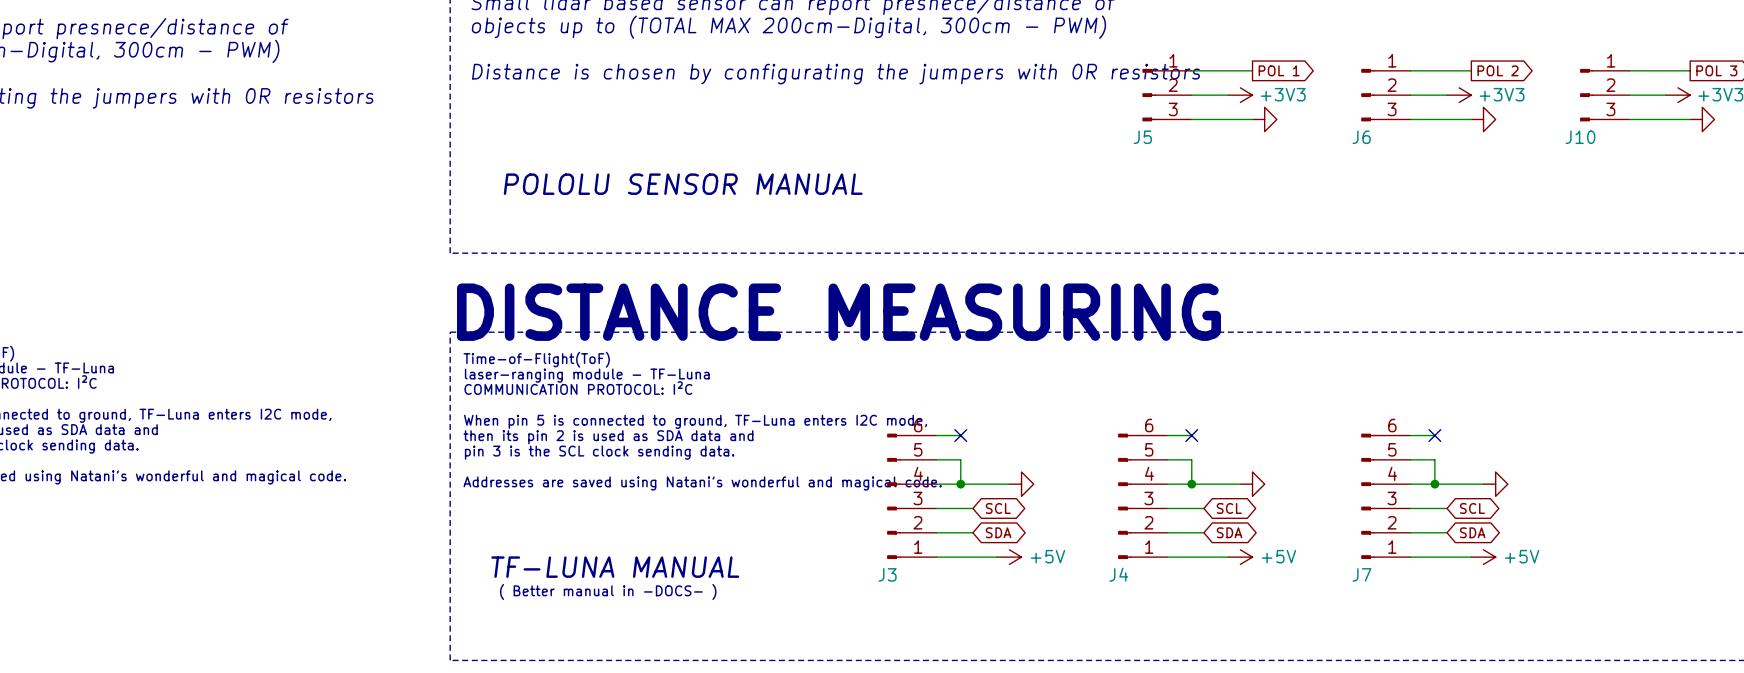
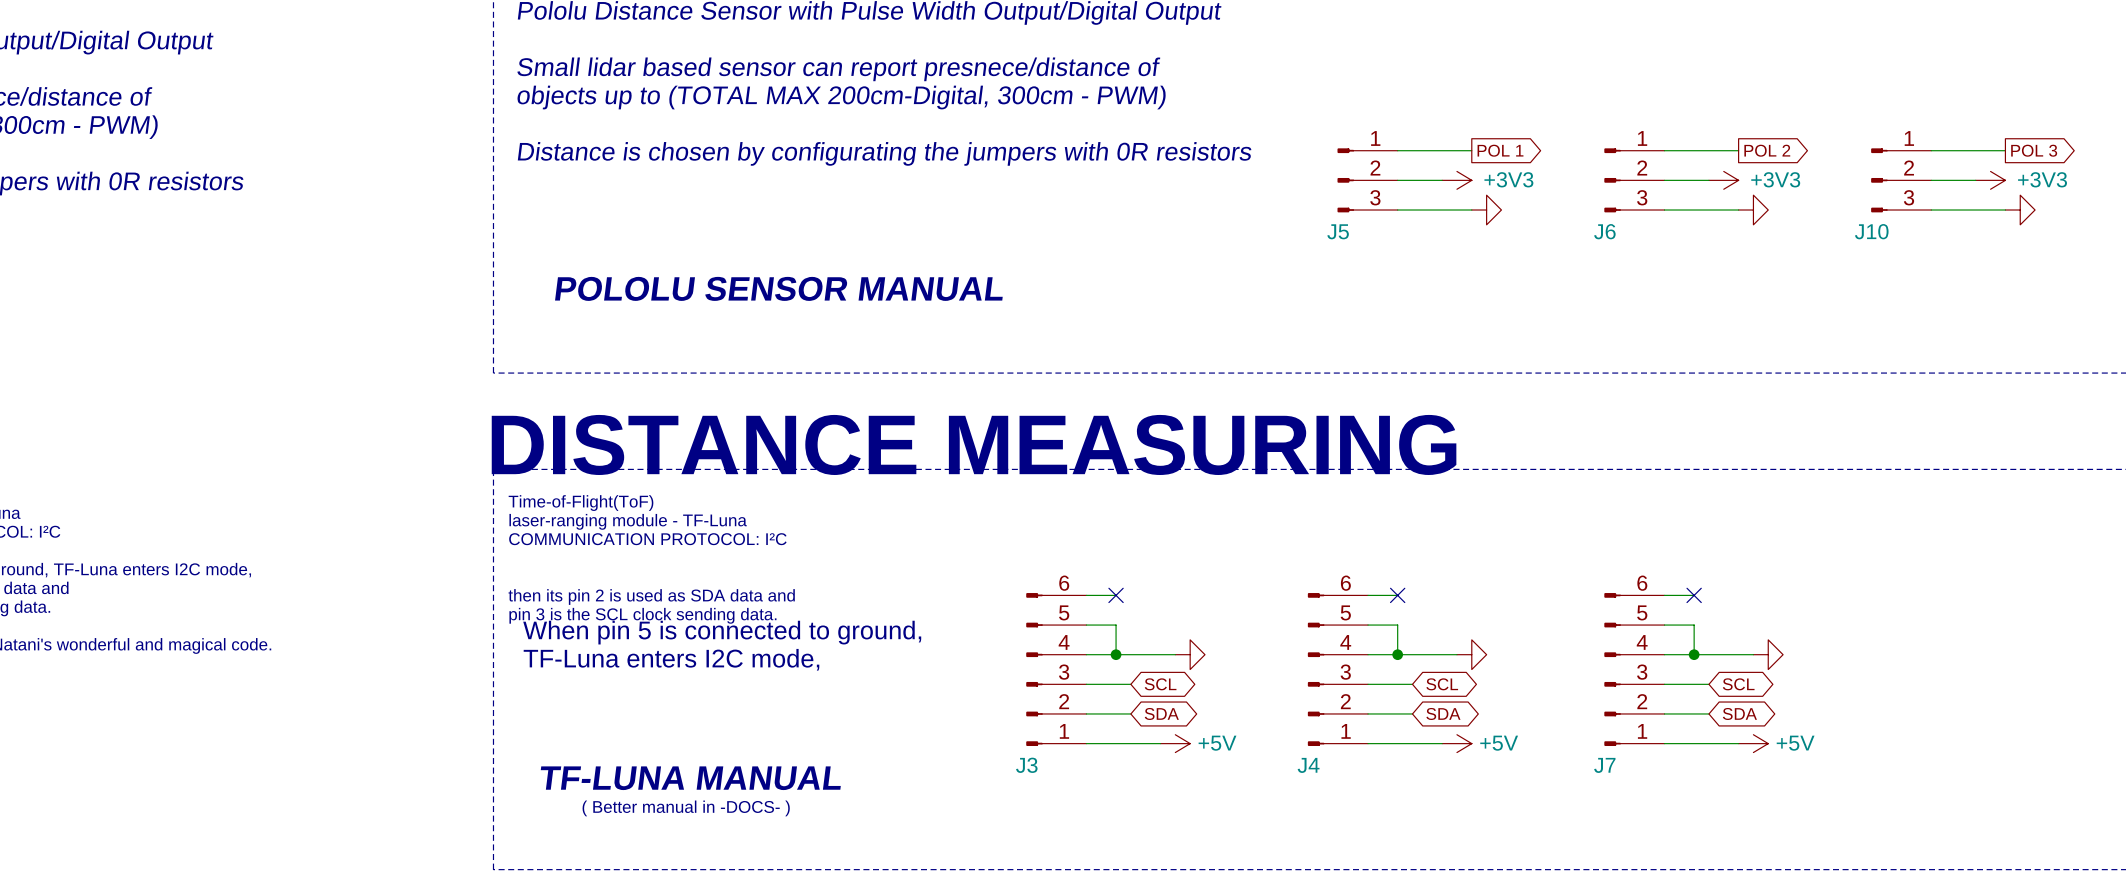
text: When pin 5 is connected to ground, TF-Luna enters I2C mode, (695, 421) -> none
text: none -> When pin 5 is connected to ground, (722, 632)
text: Addresses are saved using Natani's wonderful and magical code. (702, 483) -> none
text: none -> TF-Luna enters I2C mode, (671, 659)
text position: TF-LUNA MANUAL (615, 567) -> TF-LUNA MANUAL (690, 778)
text position: ( Better manual in -DOCS- ) (608, 591) -> ( Better manual in -DOCS- ) (686, 808)

